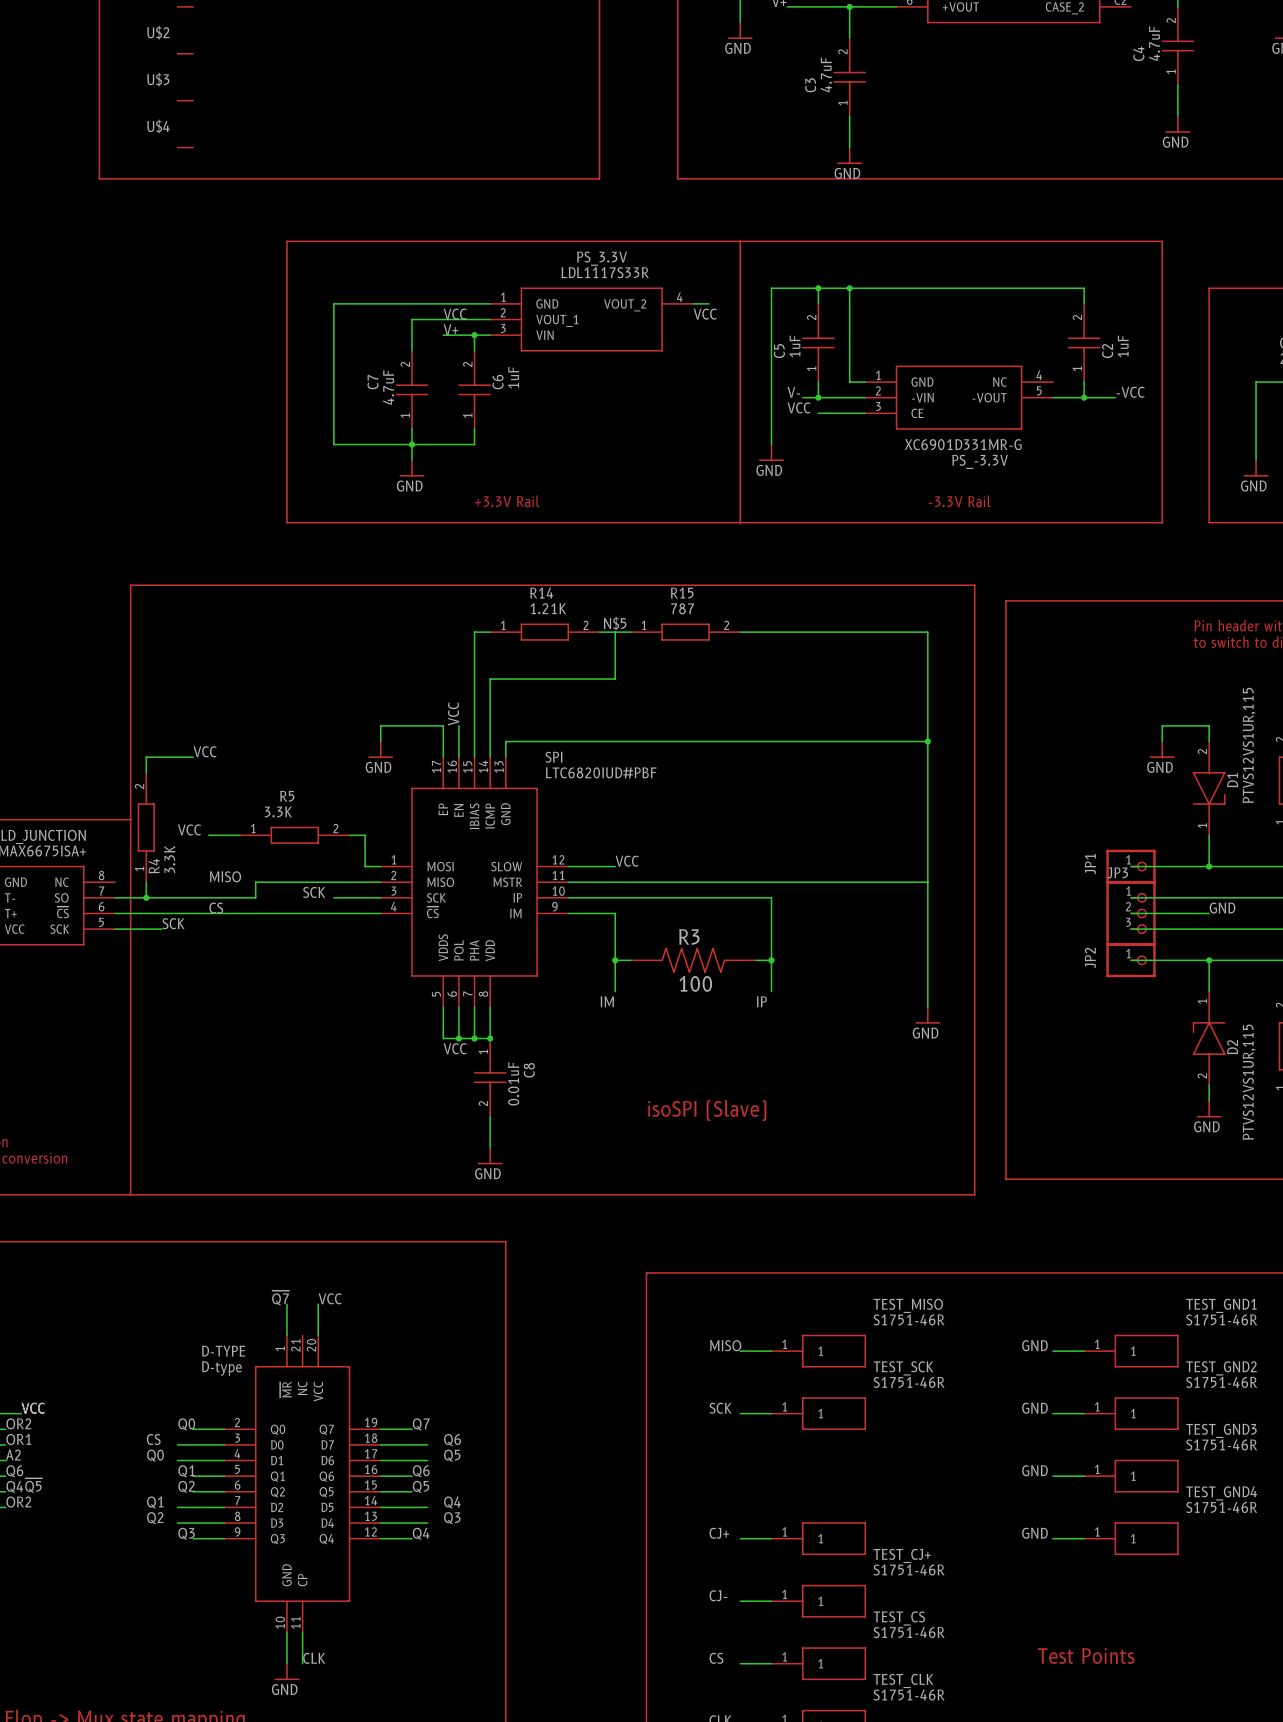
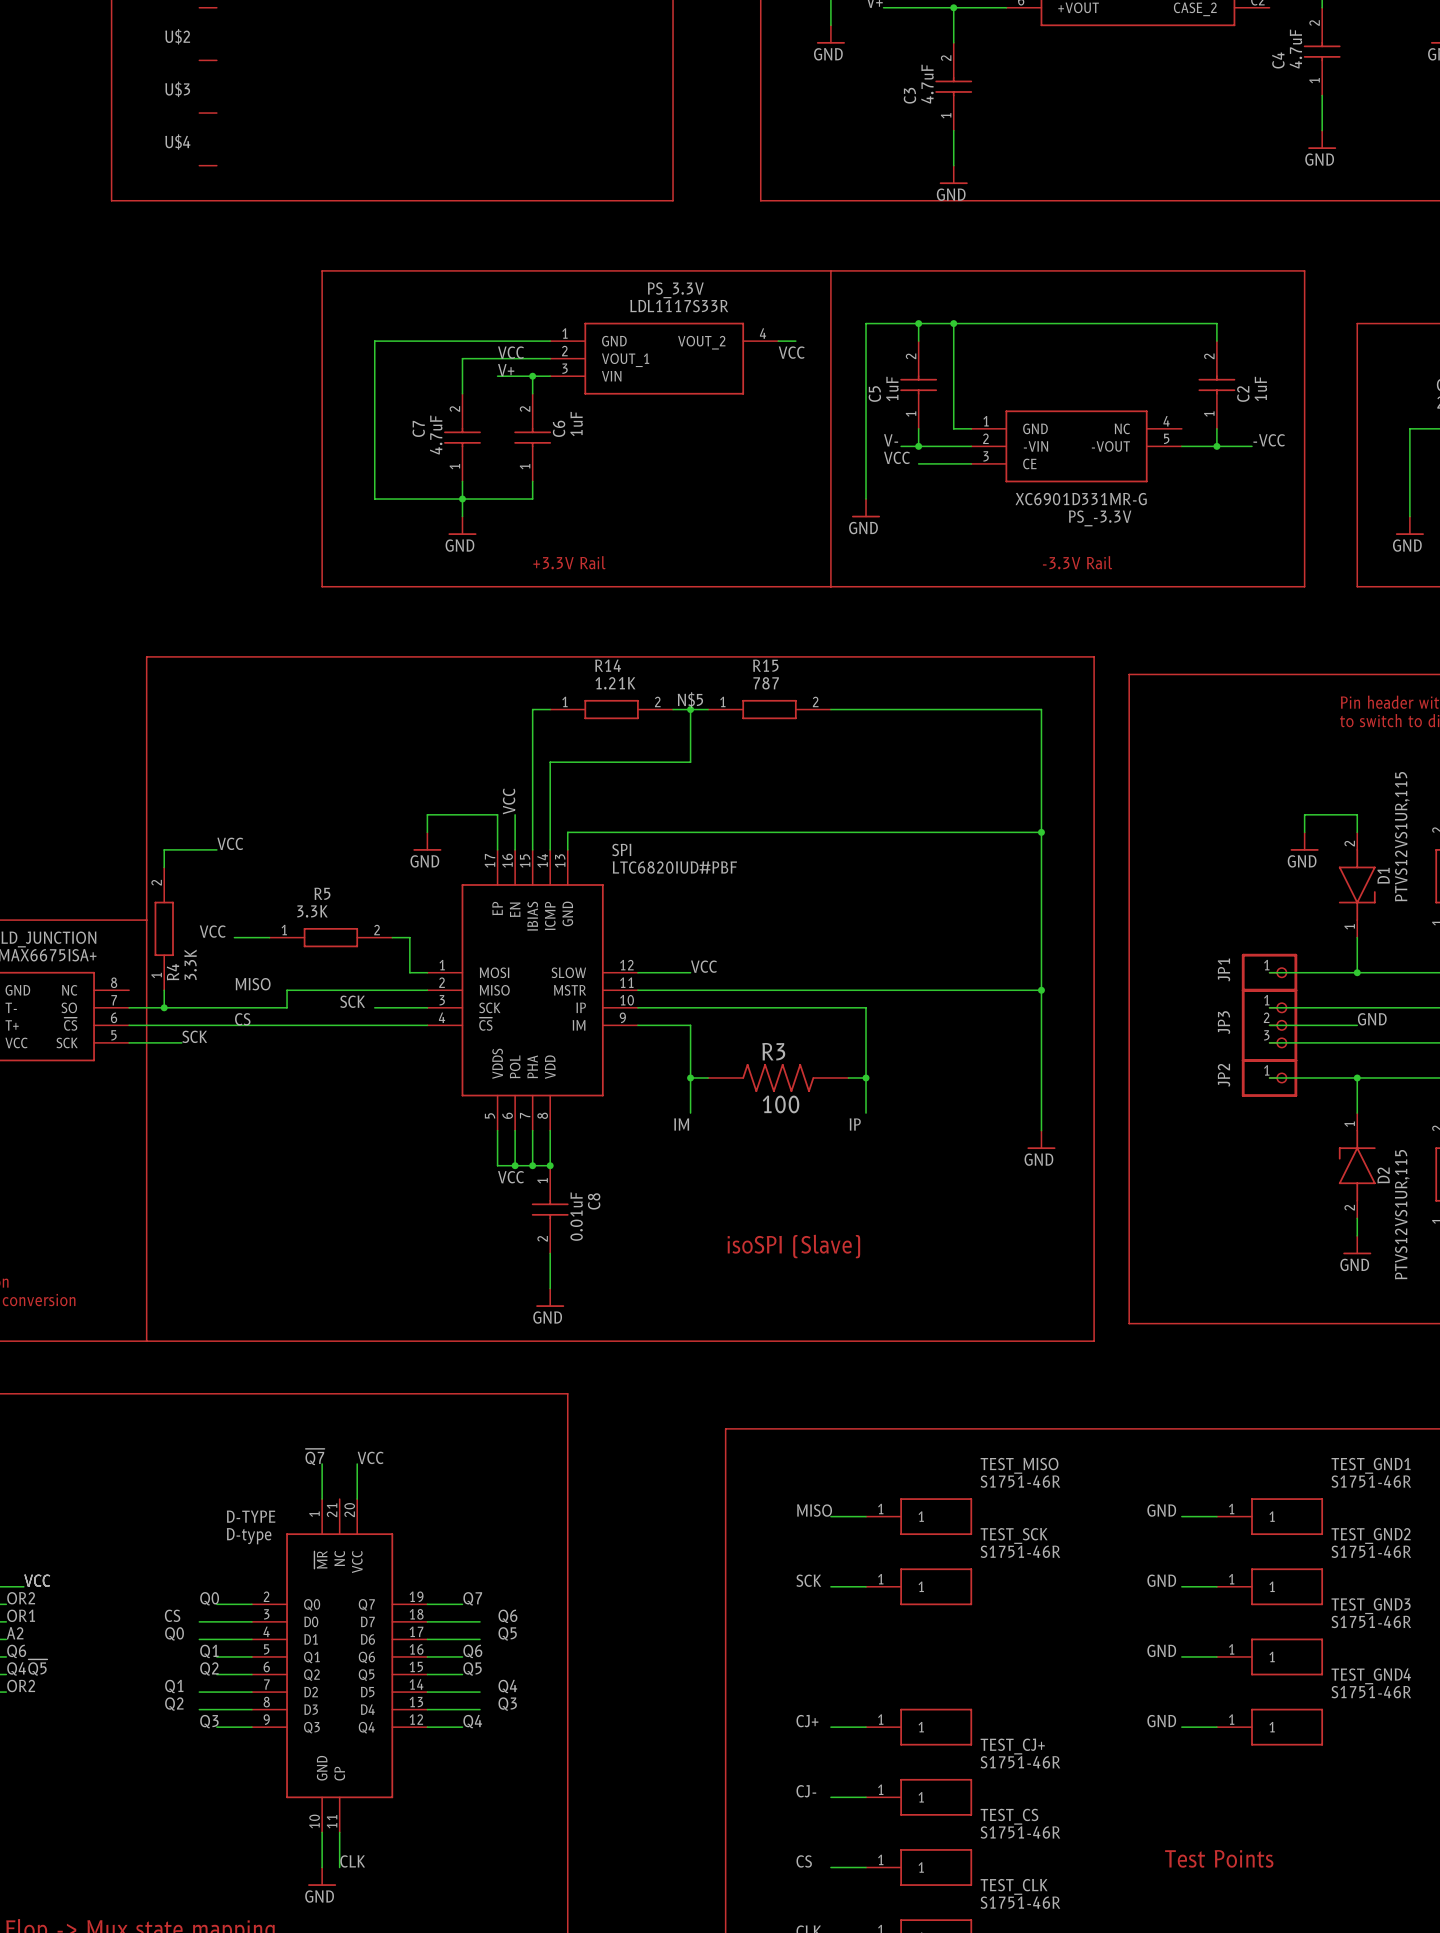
junction: none -> (690, 709)
JP3 name rotation: 0° (1117, 872) -> 90° counterclockwise (1223, 1022)
JP3 name position: JP3 (1117, 872) -> JP3 (1223, 1022)
junction: none -> (1041, 990)

